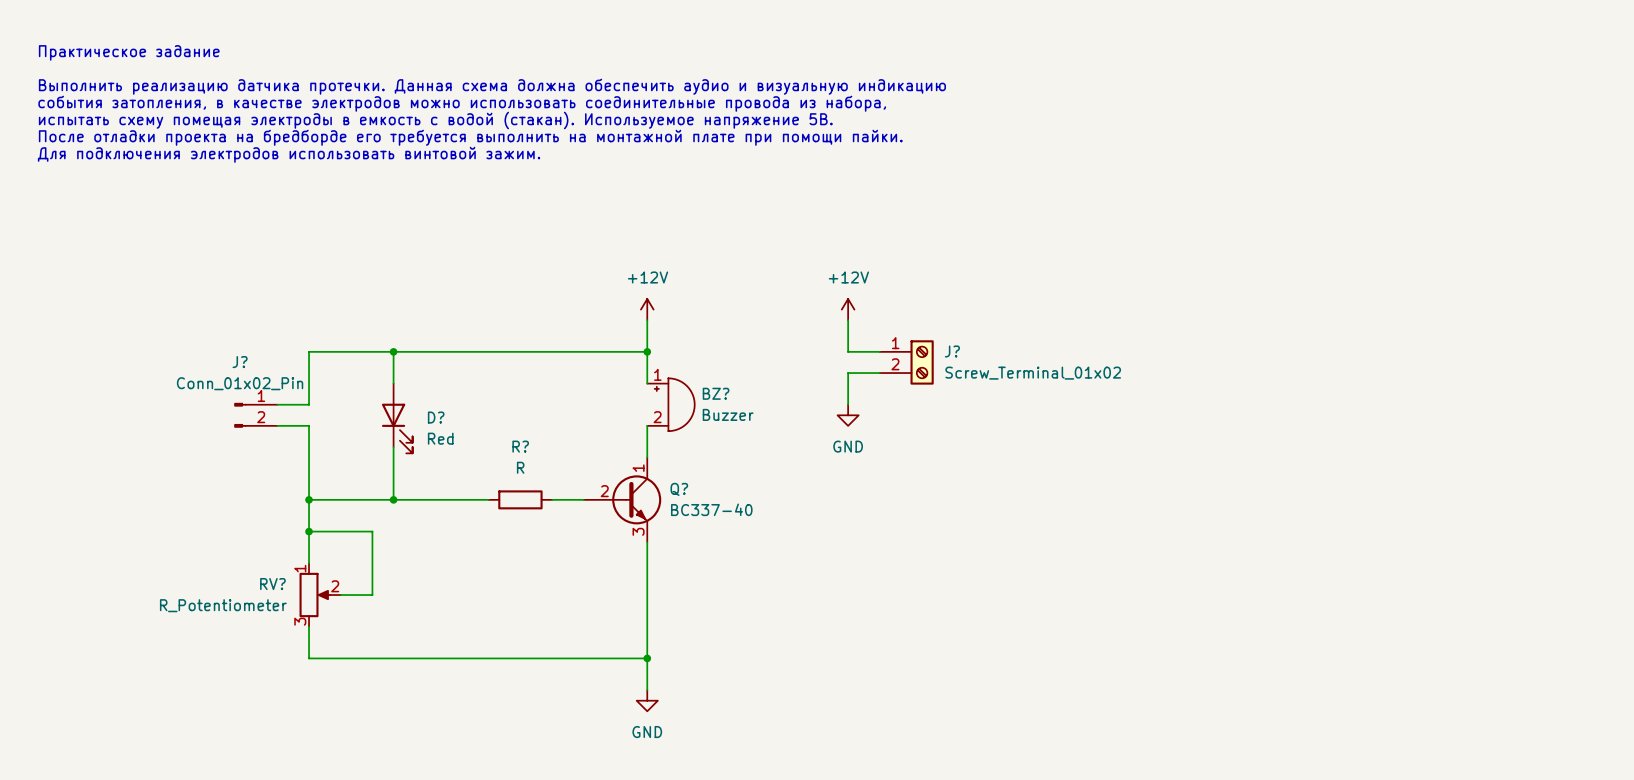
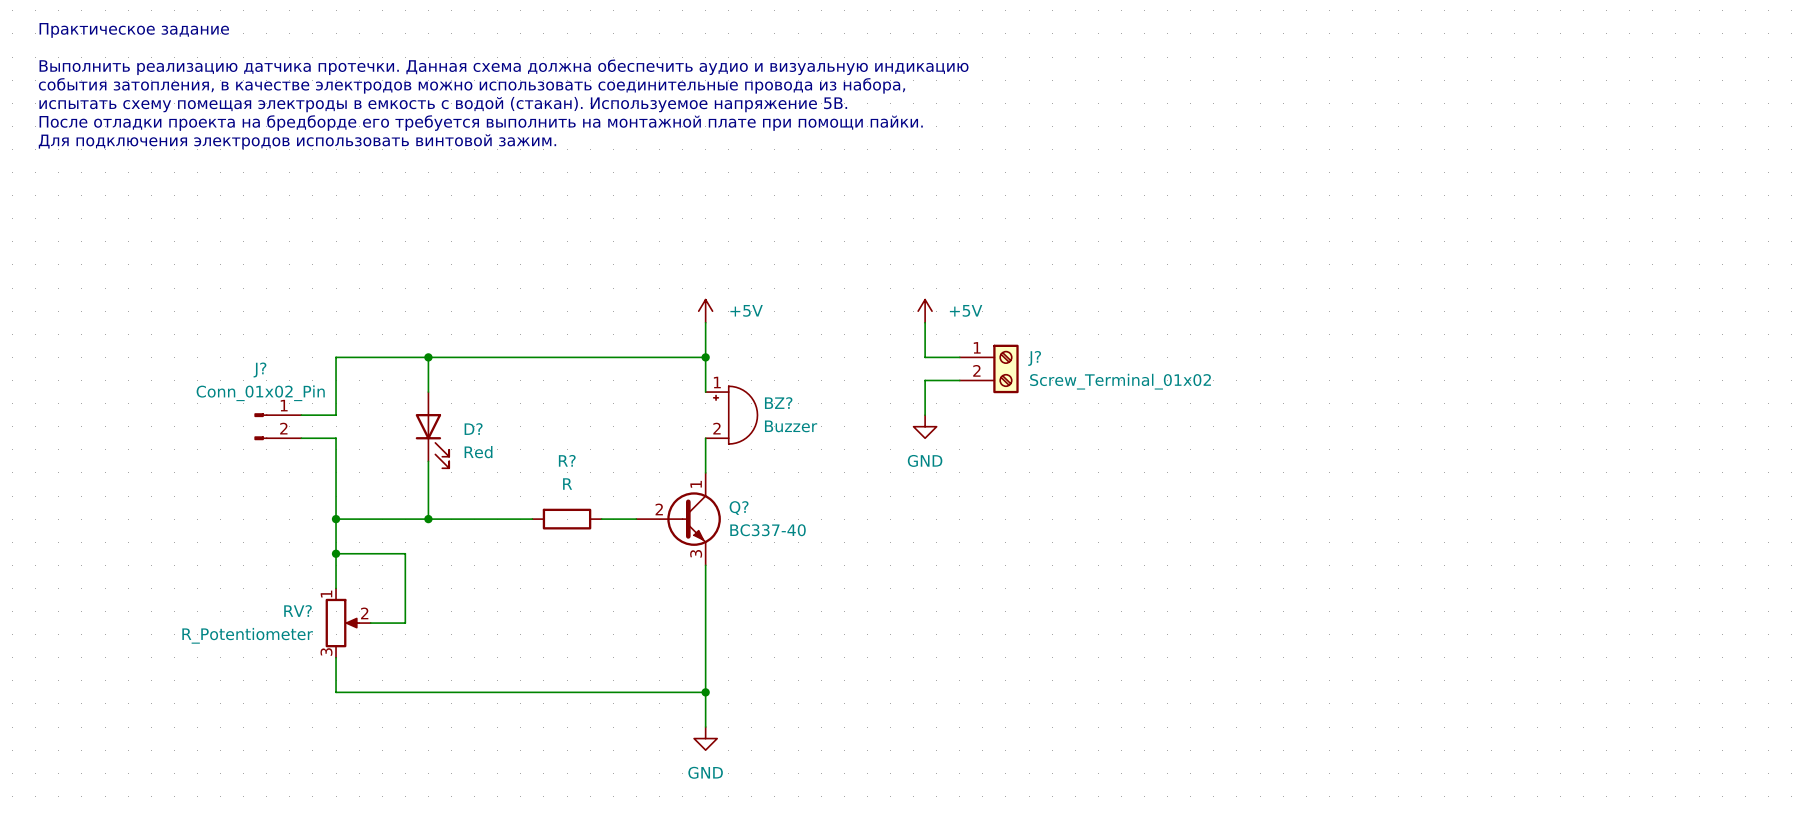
power symbol: +12V (647, 309) -> +5V (705, 311)
power symbol: +12V (848, 309) -> +5V (925, 311)

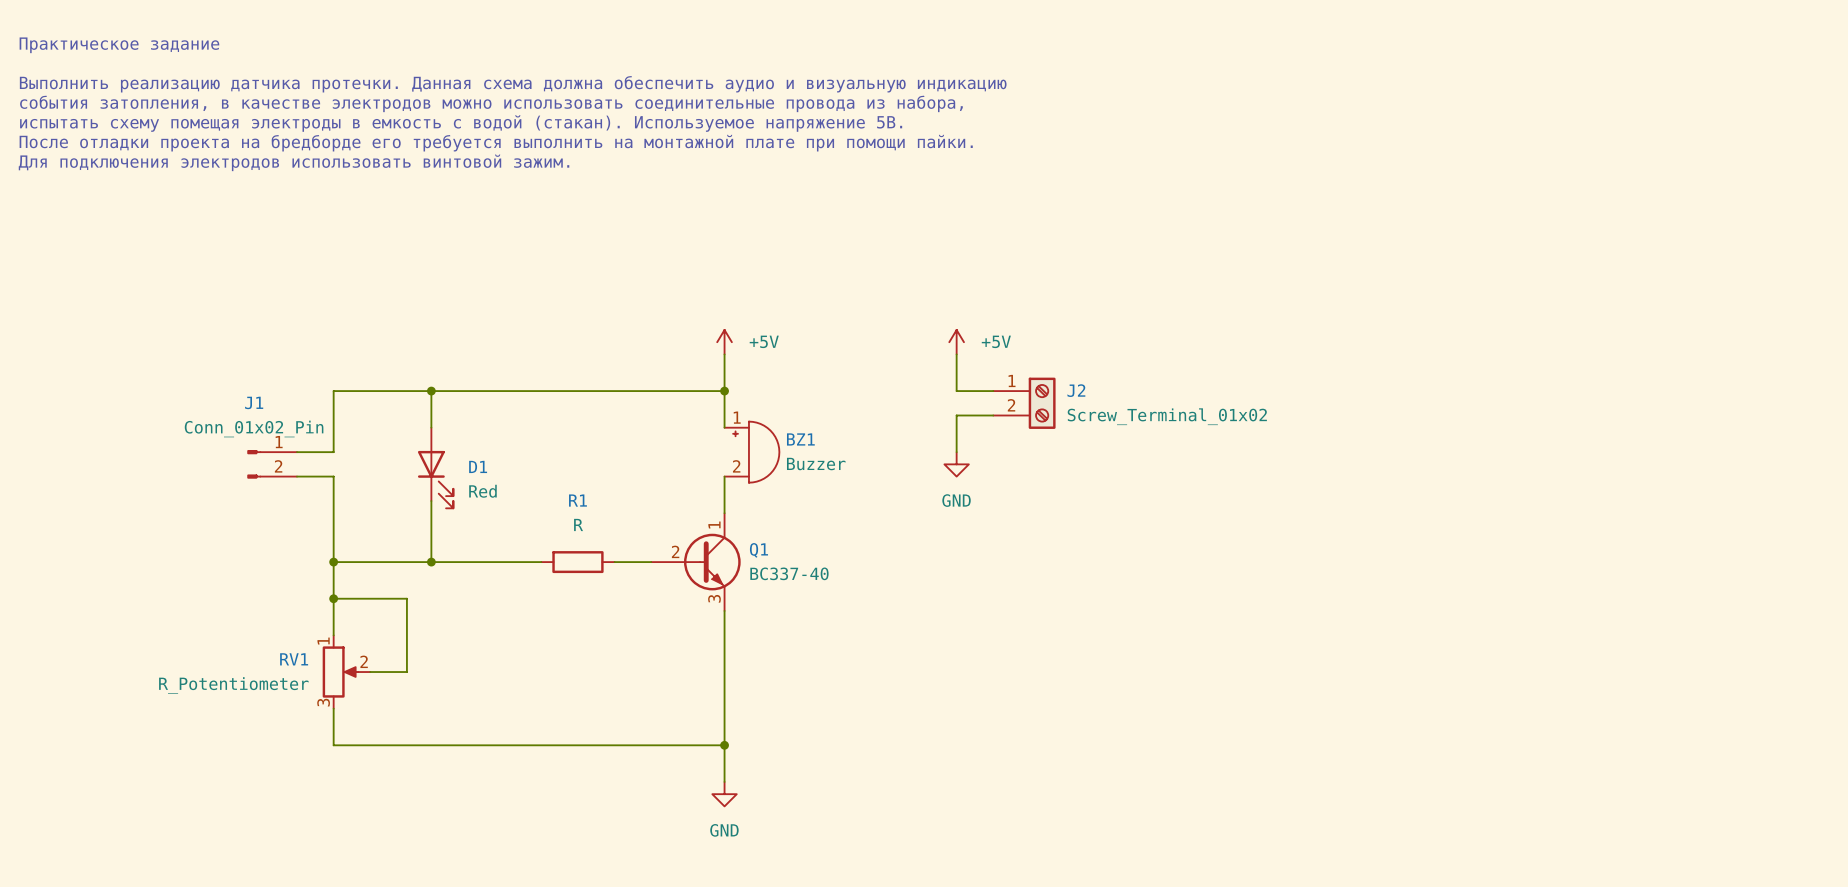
J? name: J? (1034, 358) -> J2 (1076, 390)
J? name: J? (259, 369) -> J1 (254, 402)
BZ? name: BZ? (778, 403) -> BZ1 (800, 439)
D? name: D? (473, 429) -> D1 (478, 466)
R? name: R? (567, 460) -> R1 (577, 500)
Q? name: Q? (739, 508) -> Q1 (758, 550)
RV? name: RV? (298, 610) -> RV1 (294, 659)

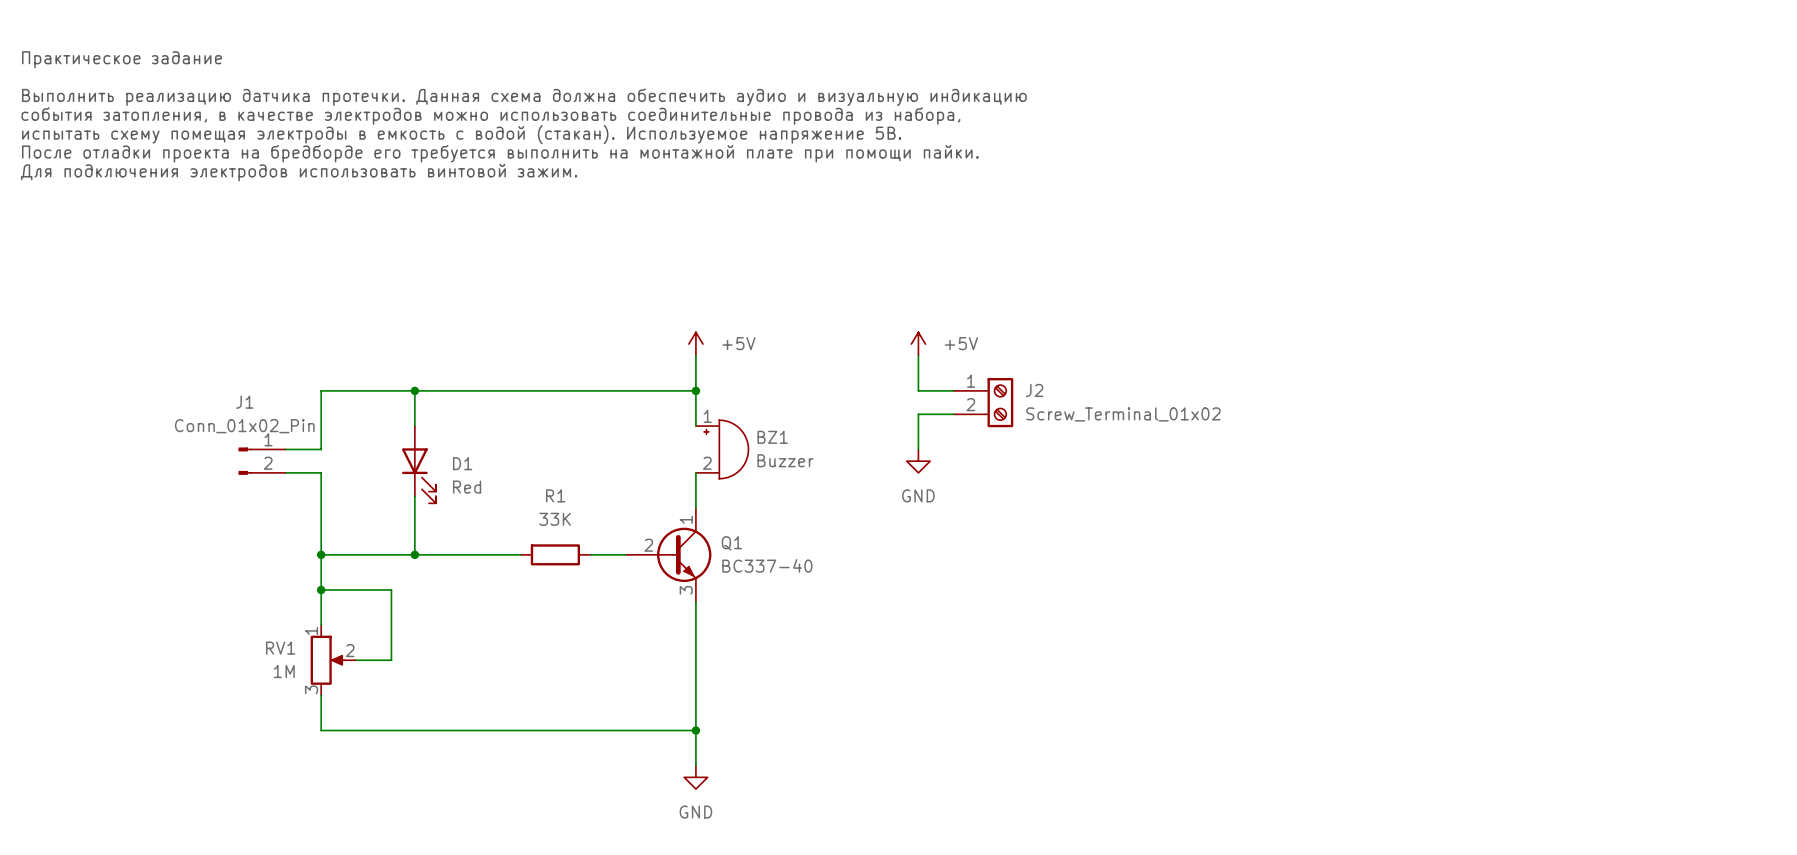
R1 value: R (578, 524) -> 33K (555, 519)
RV1 value: R_Potentiometer (233, 685) -> 1M (284, 671)

